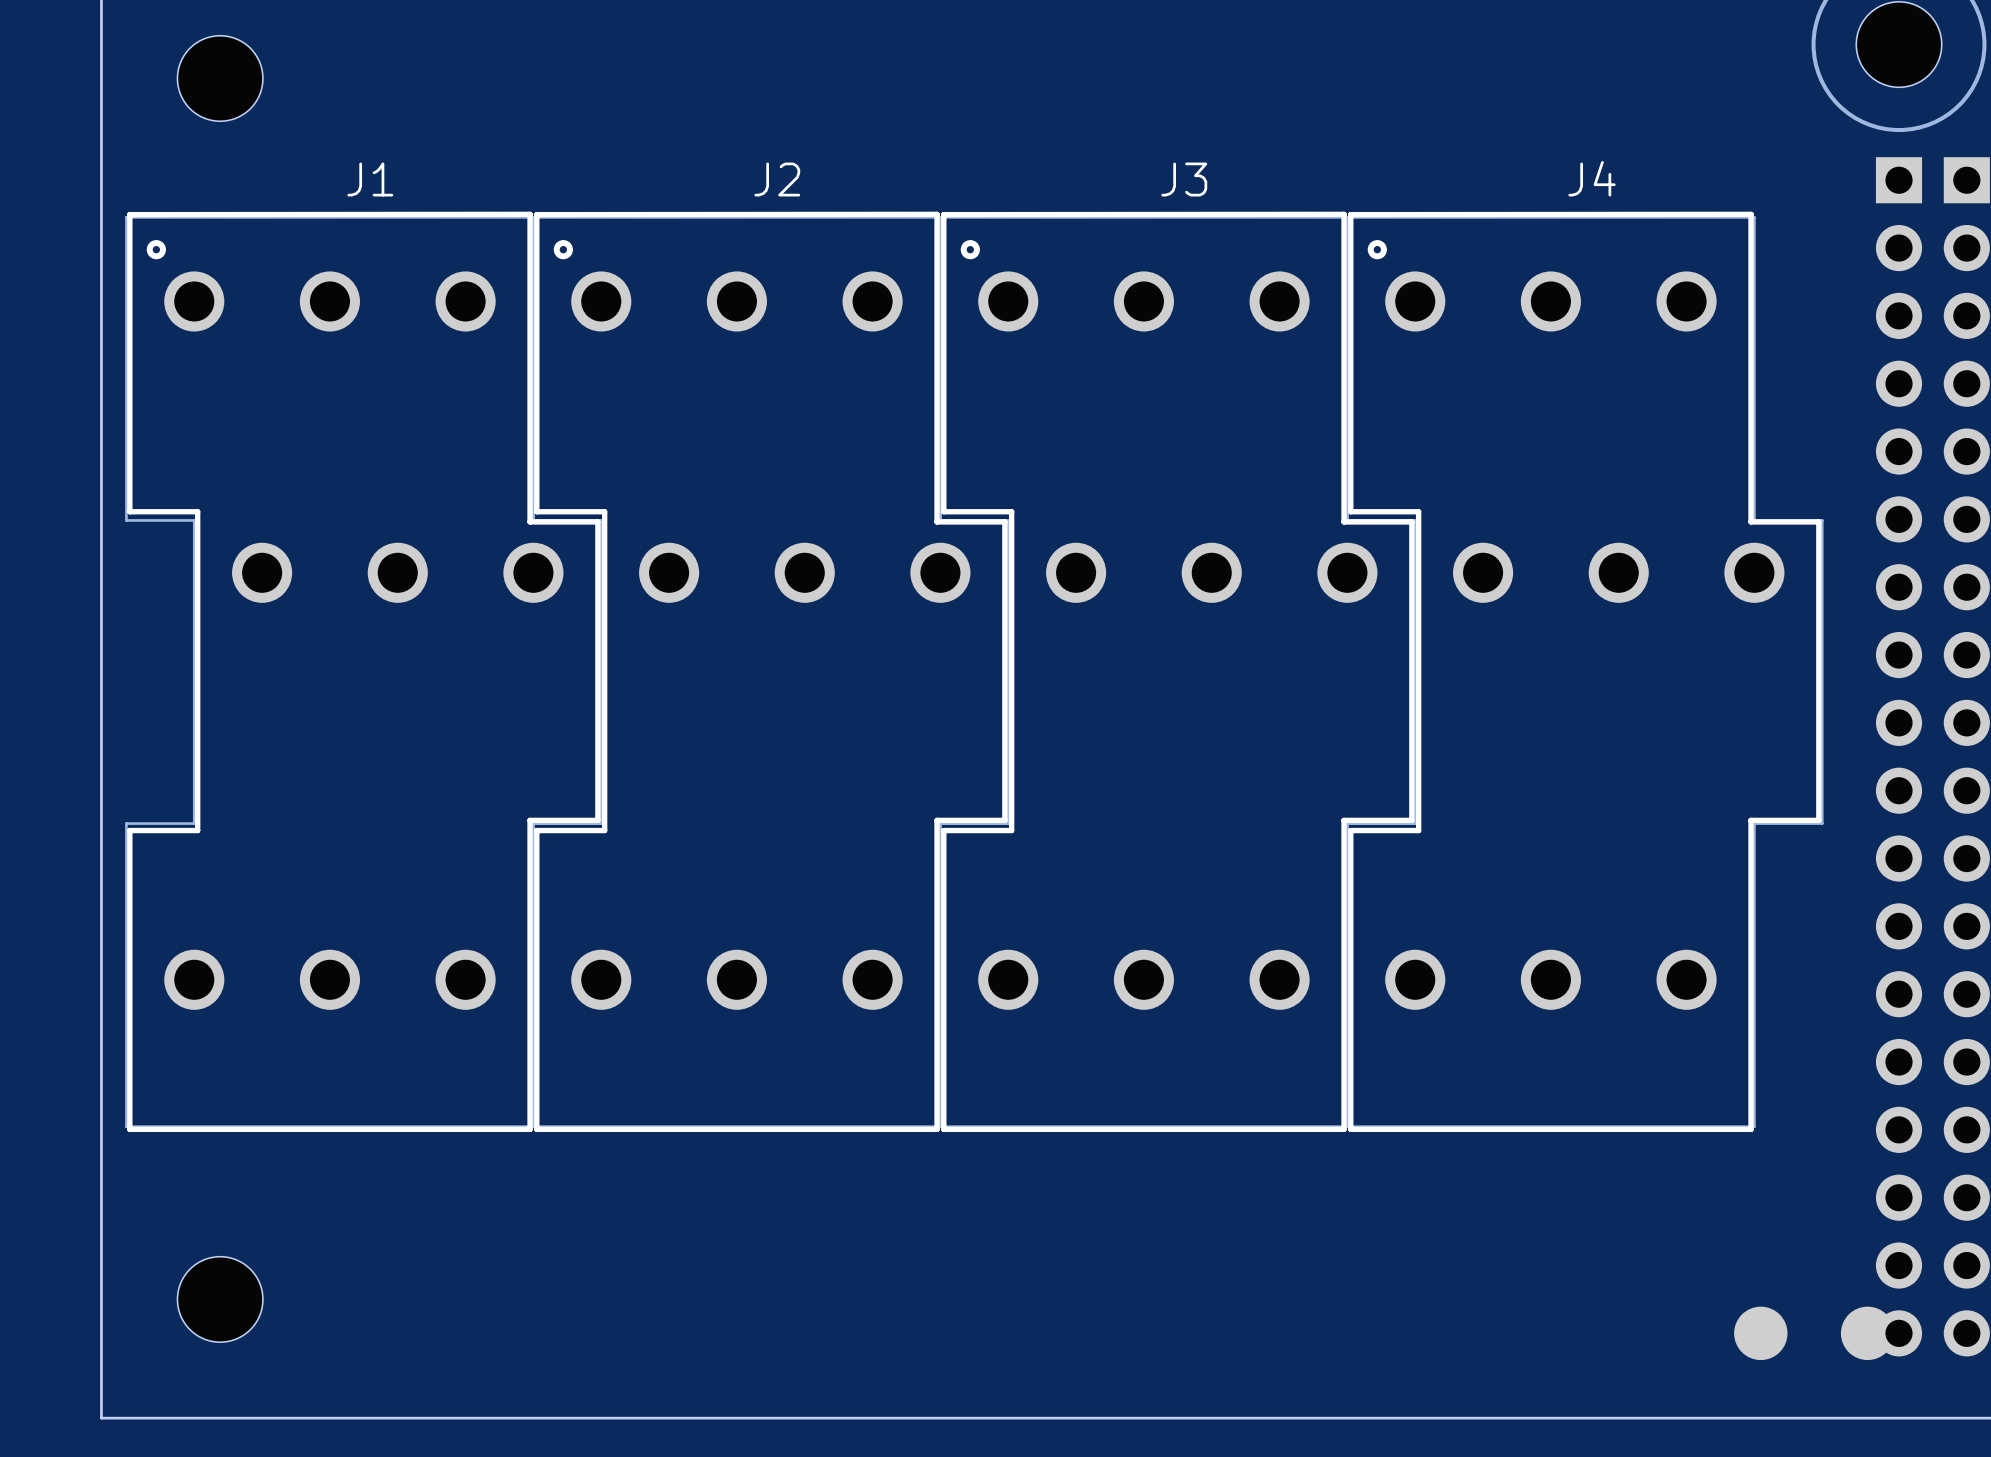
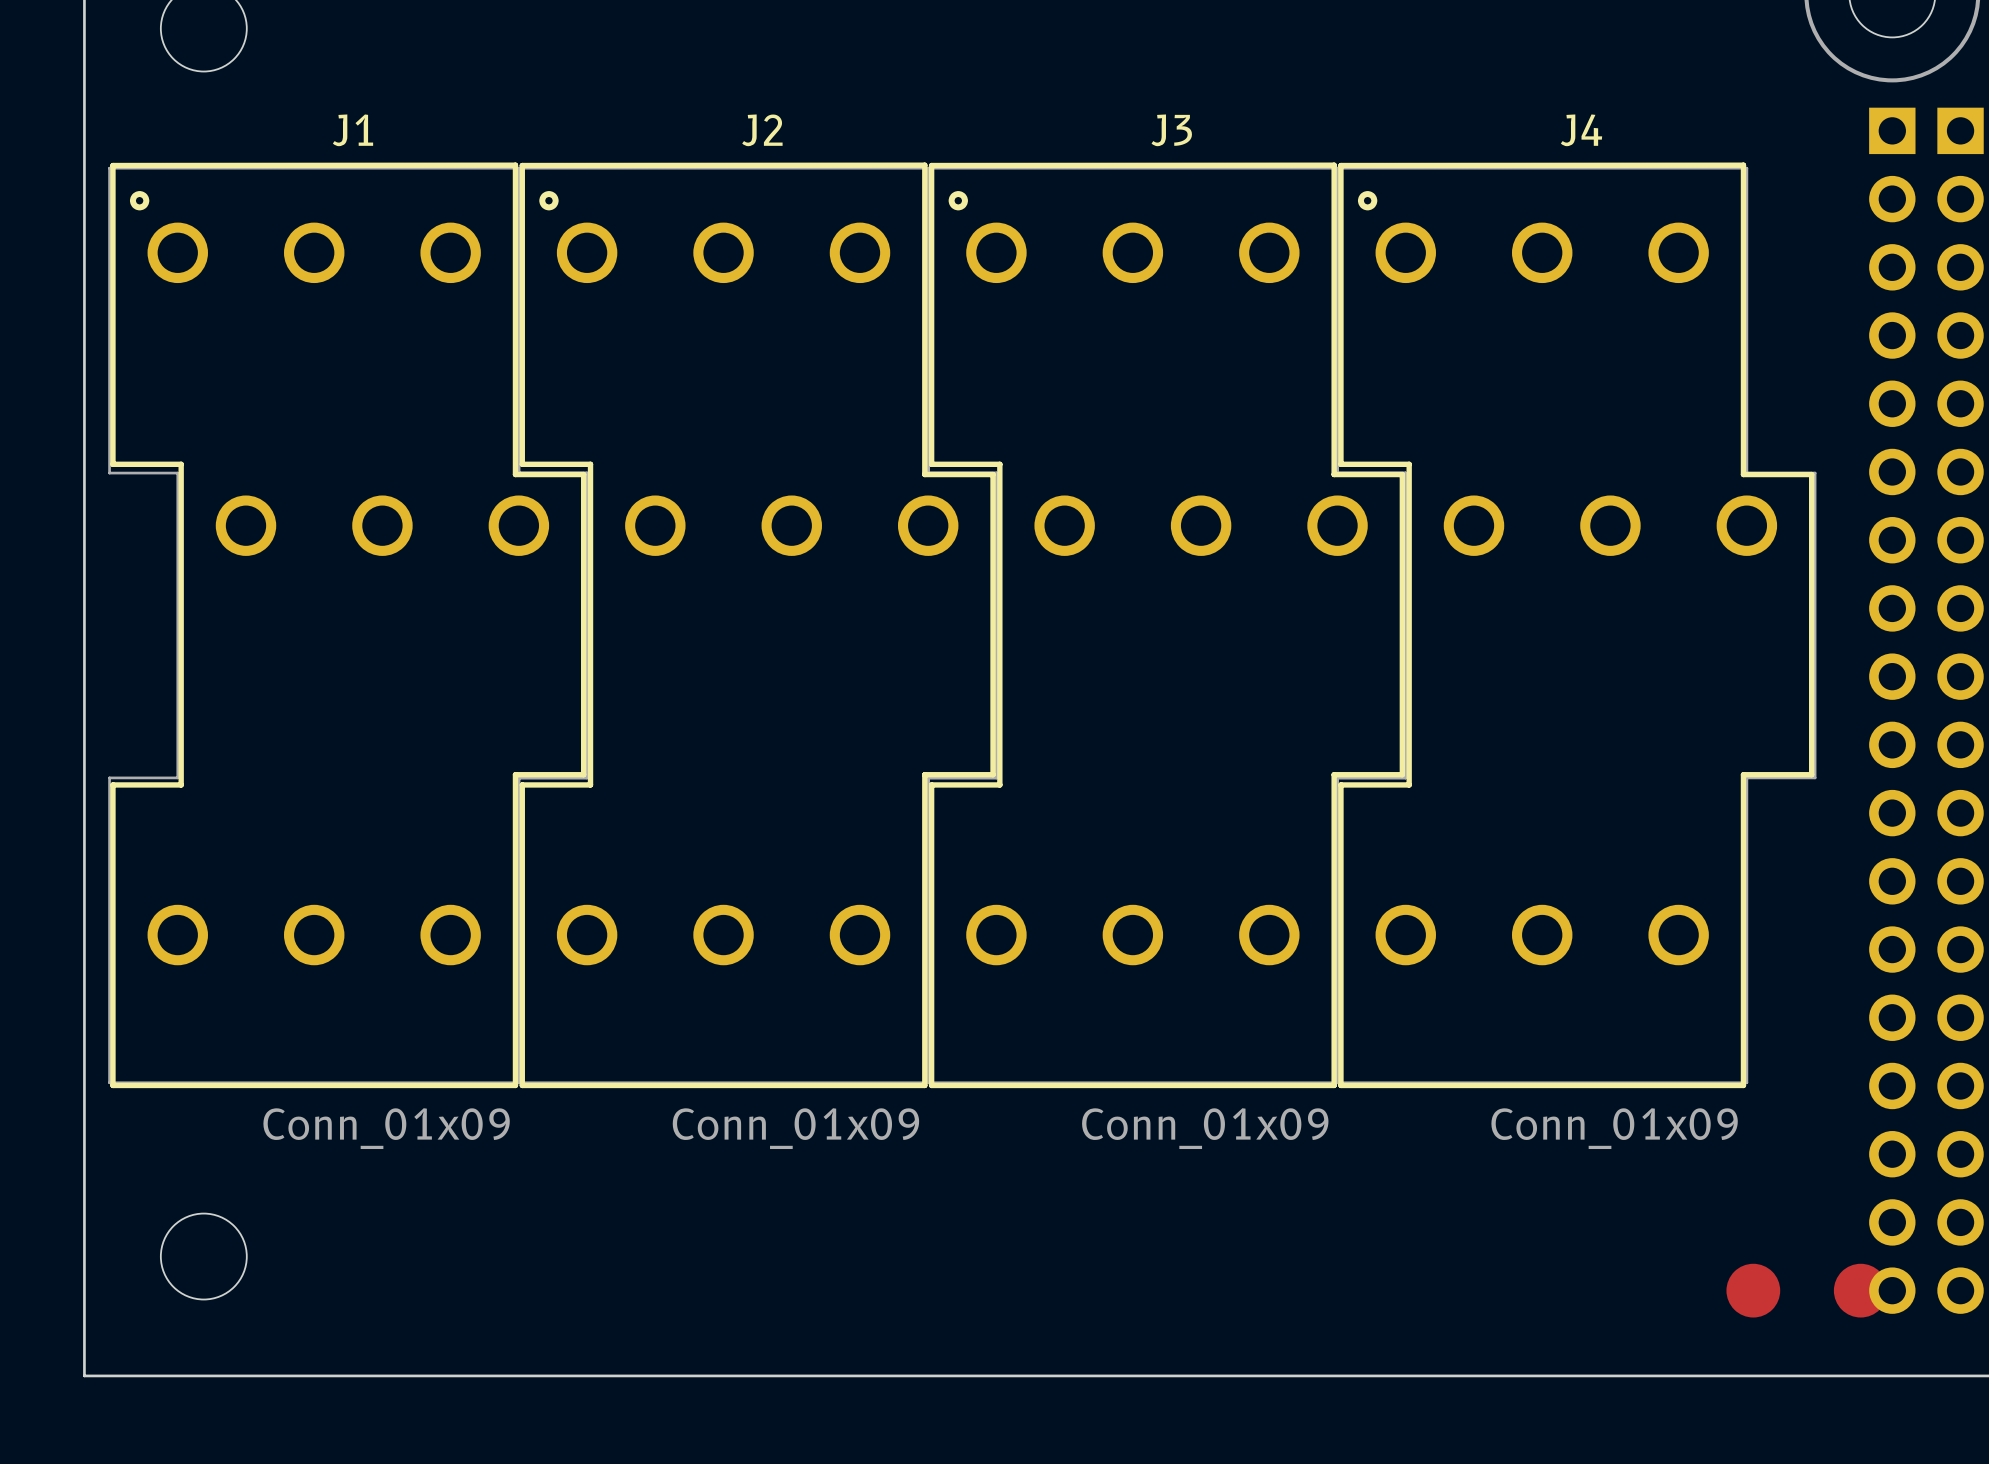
J1 value: none -> Conn_01x09 (386, 1128)
J2 value: none -> Conn_01x09 (795, 1128)
J3 value: none -> Conn_01x09 (1205, 1128)
J4 value: none -> Conn_01x09 (1614, 1128)

